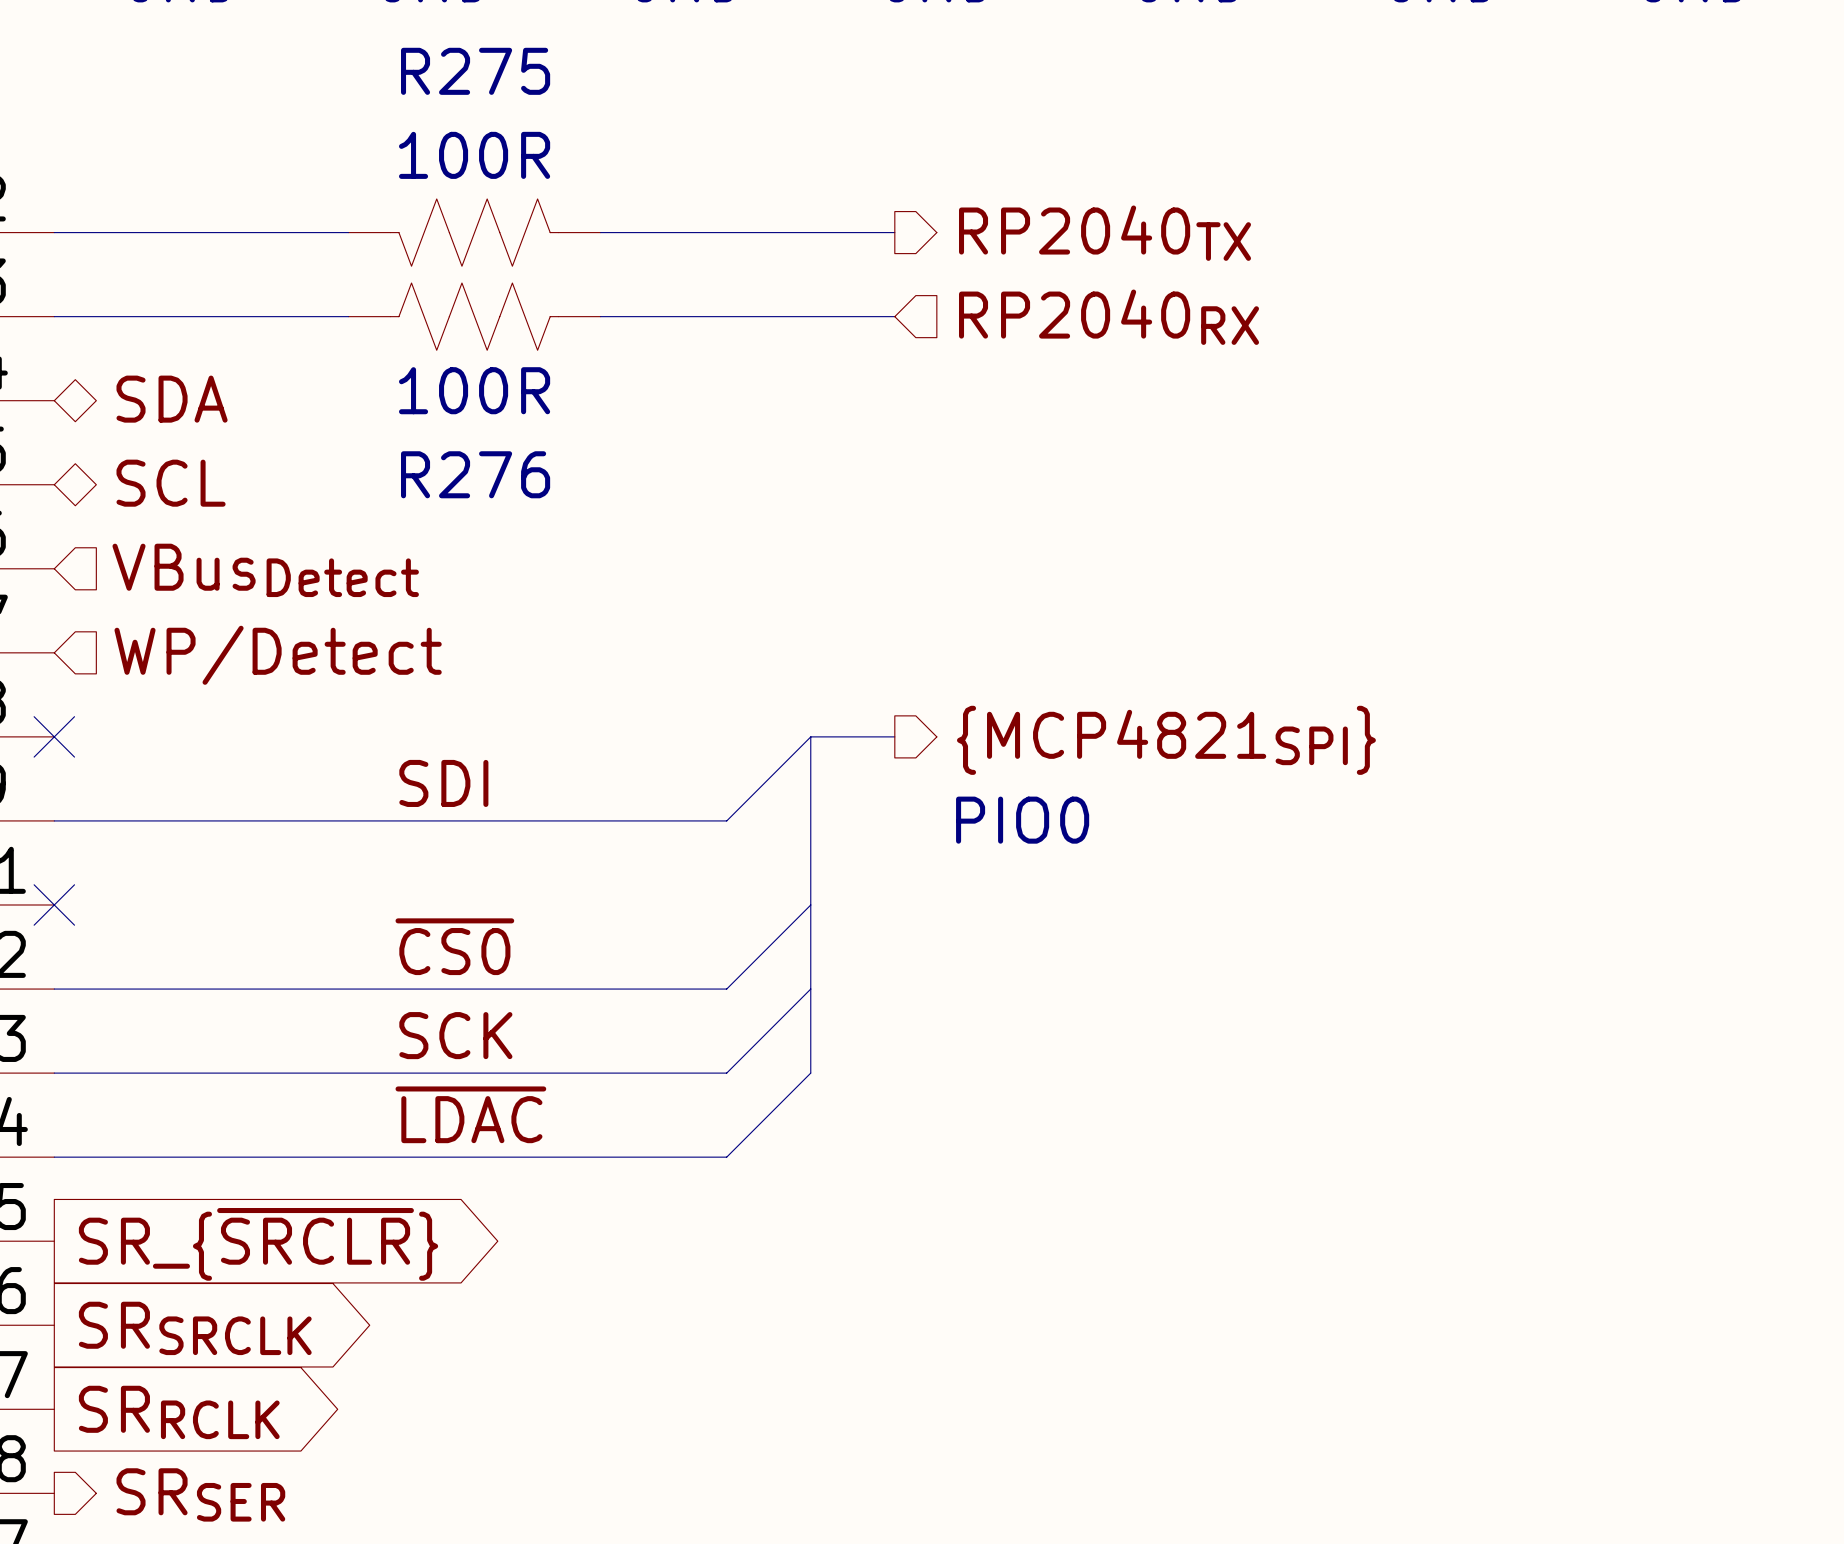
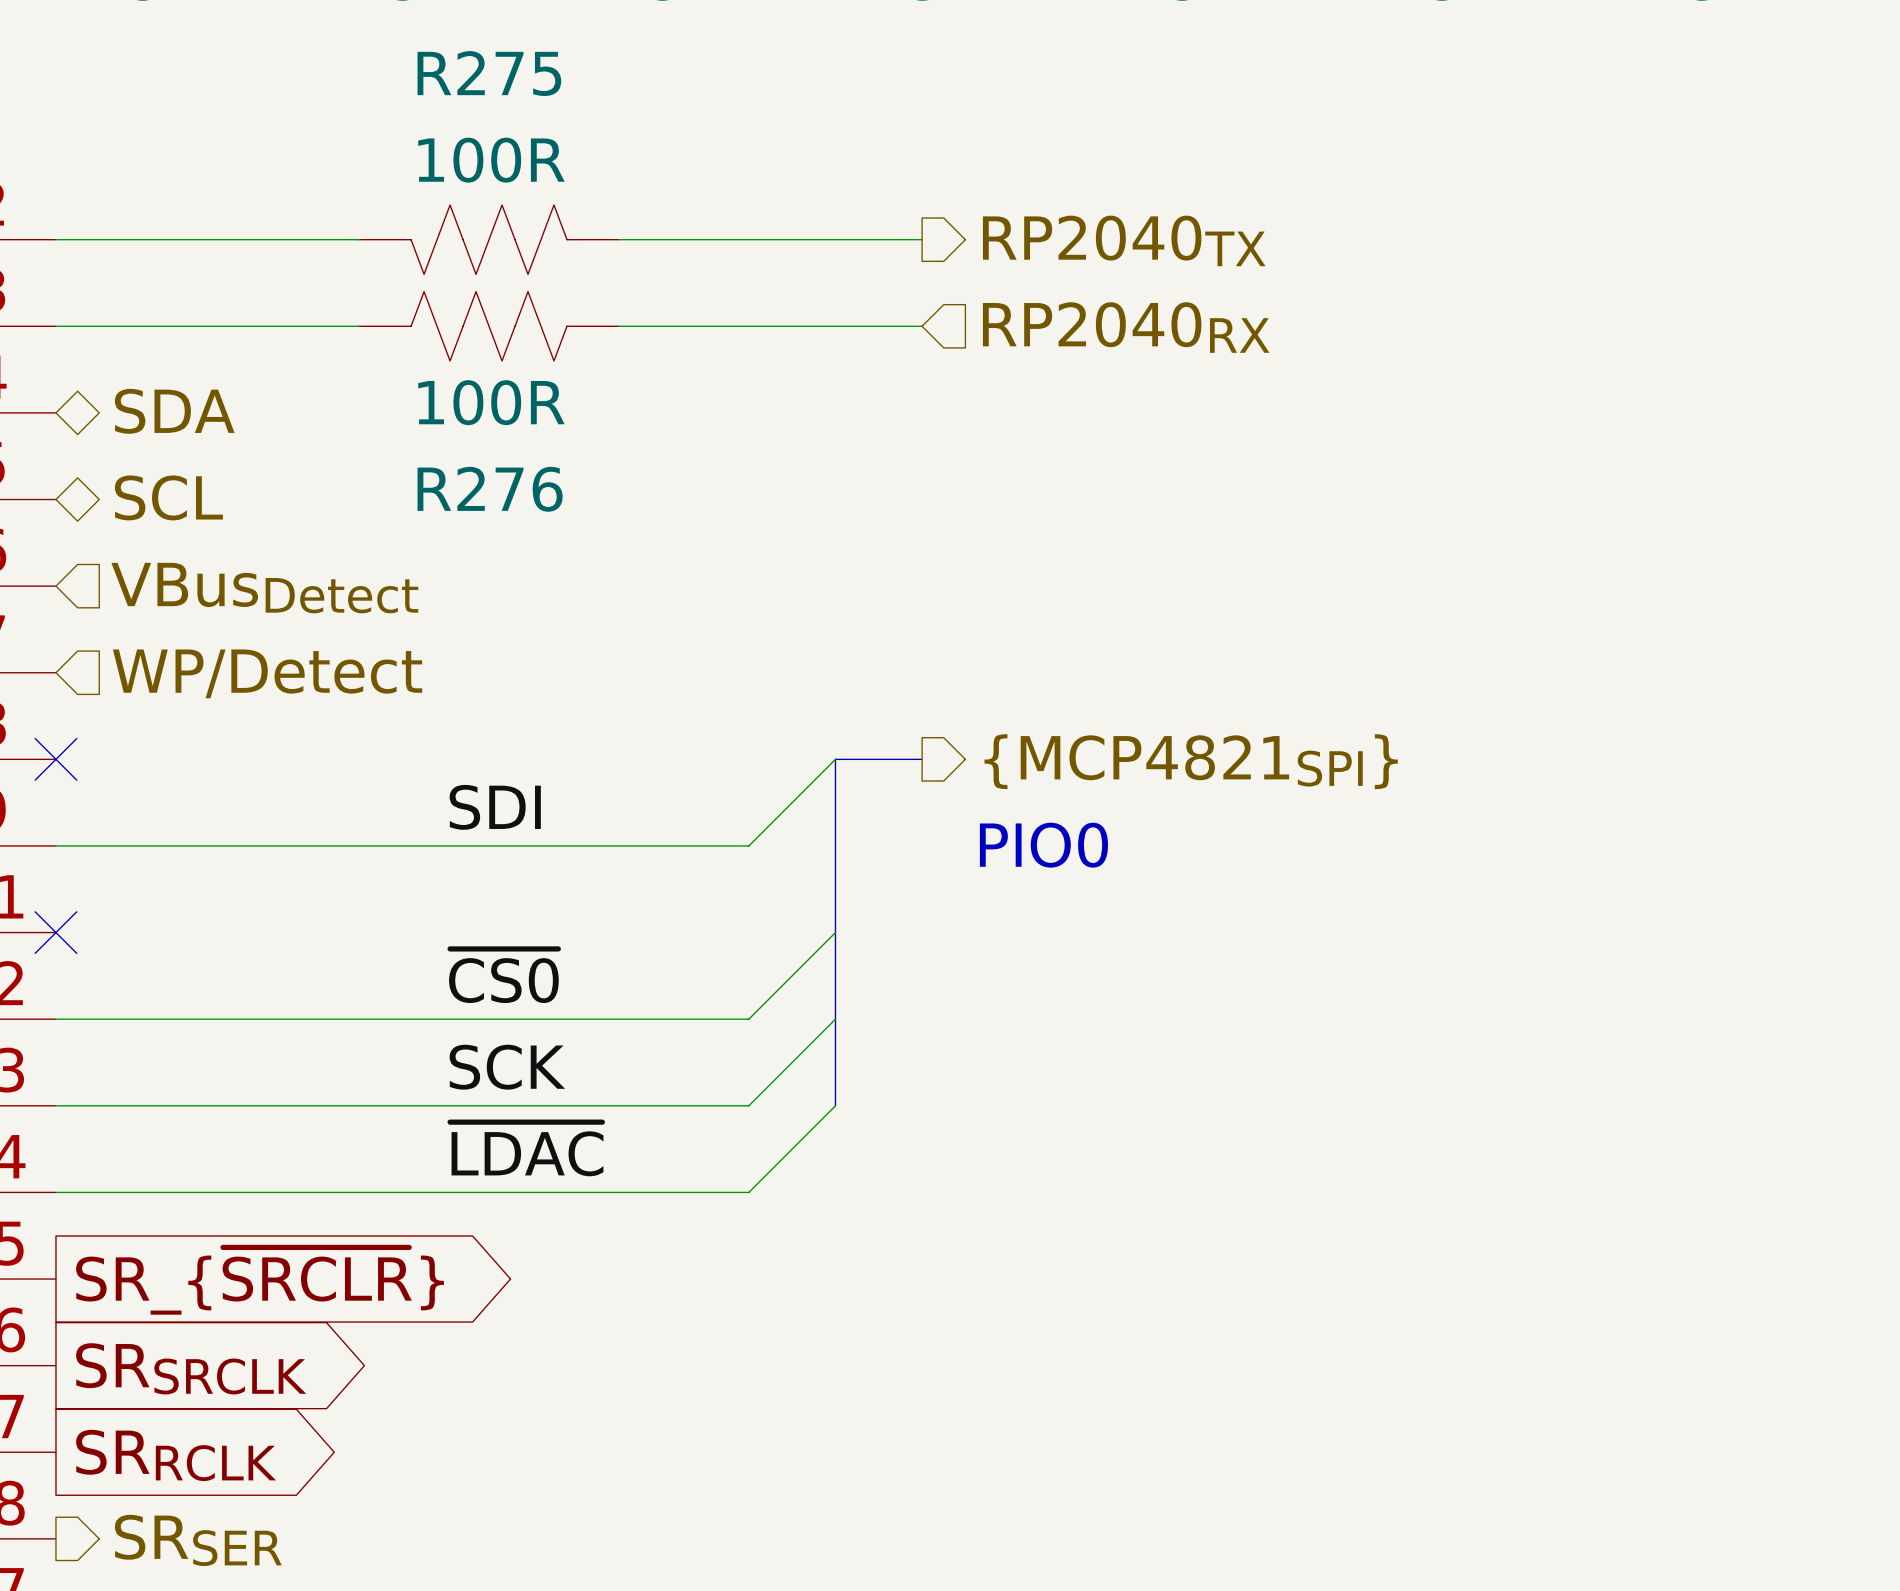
label position: SDI (443, 783) -> SDI (495, 807)
label position: ~{CS0} (454, 946) -> ~{CS0} (503, 975)
label position: SCK (455, 1035) -> SCK (507, 1067)
label position: ~{LDAC} (470, 1114) -> ~{LDAC} (526, 1149)

